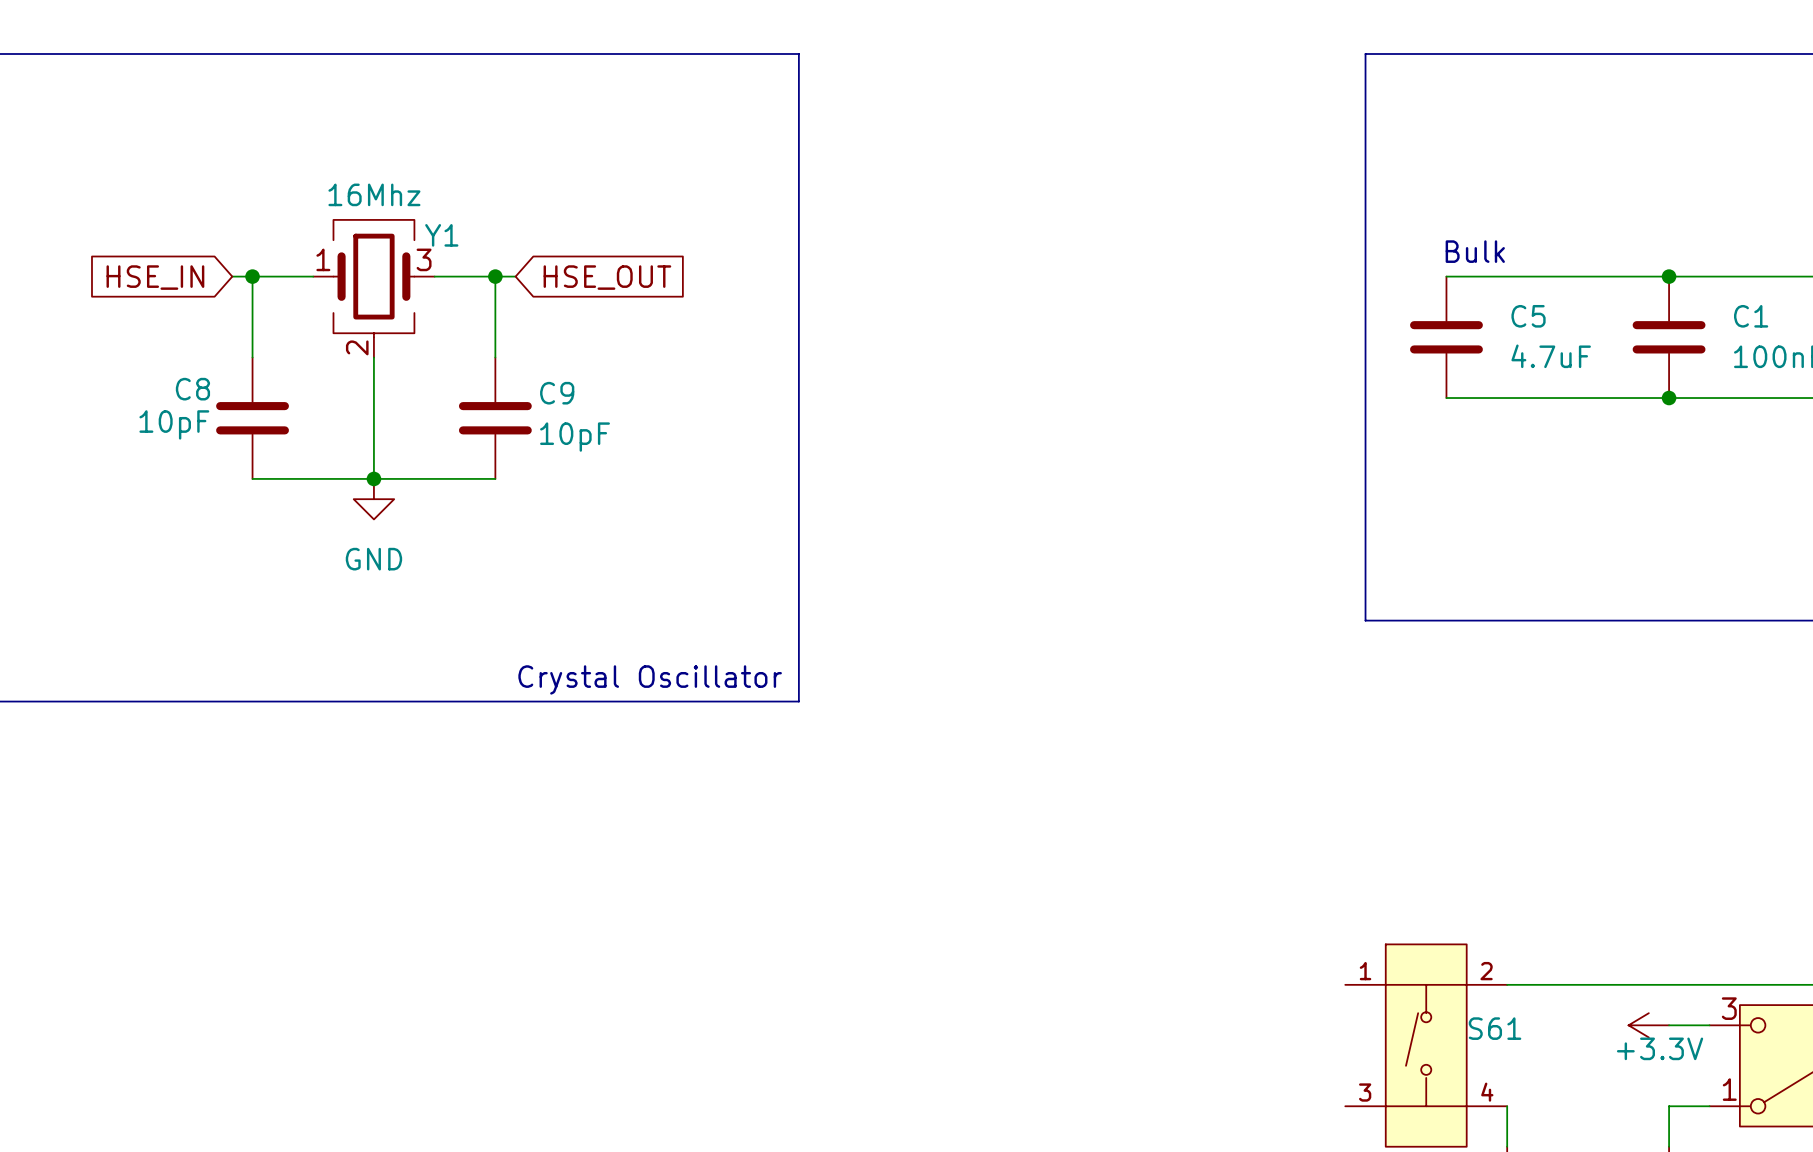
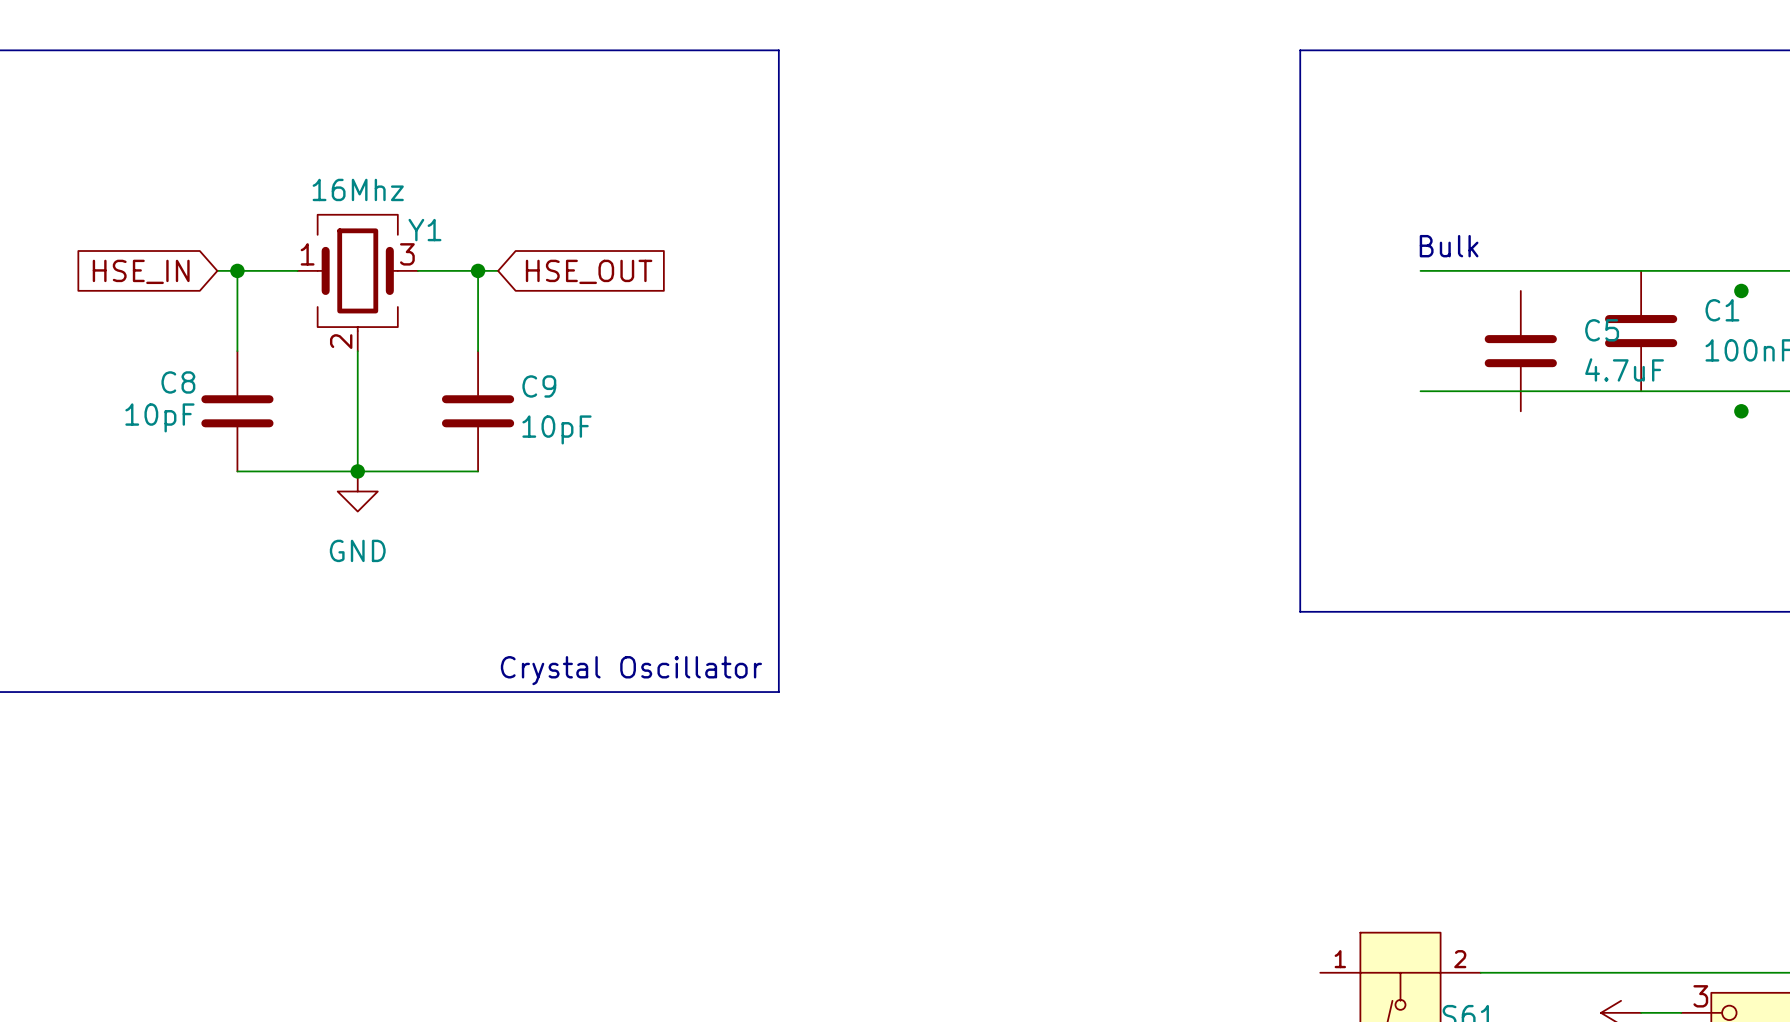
line: (1365, 53) (1365, 620) -> (1340, 50) (1300, 50) (1300, 611) (1340, 611)
junction: (1669, 276) -> none
junction: none -> (1741, 290)
C5 position: (1446, 337) -> (1520, 351)
junction: (1669, 398) -> none
junction: none -> (1741, 411)

